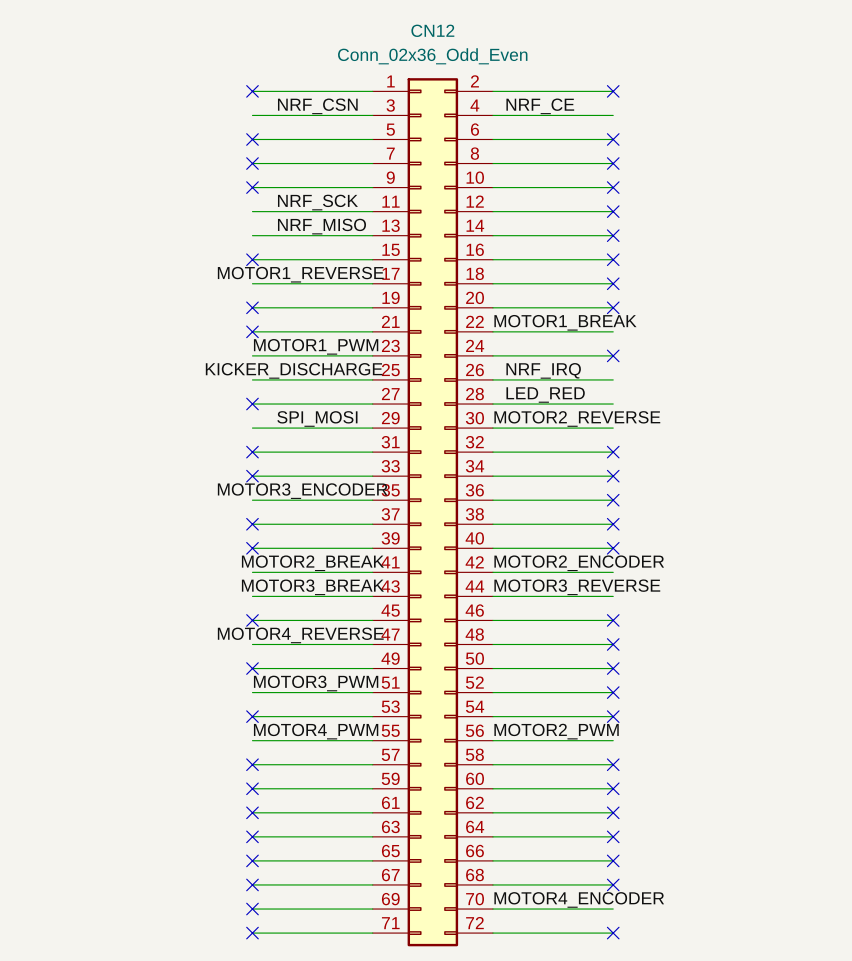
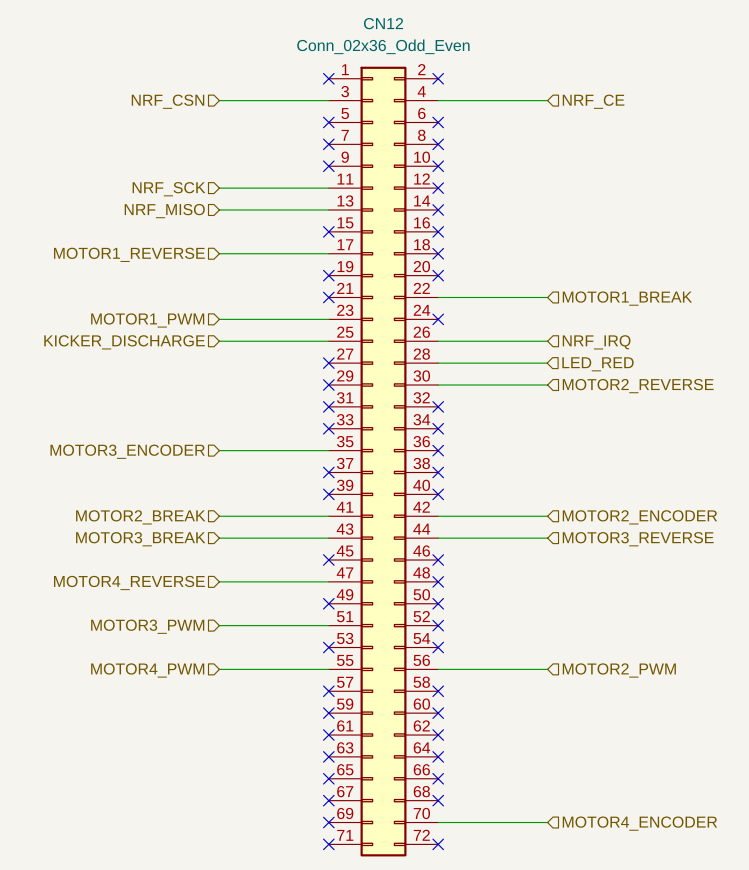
wire: (252, 91) (372, 91) -> none
no-connect mark: (252, 91) -> none
no-connect mark: none -> (328, 78)
wire: (492, 91) (613, 91) -> none
no-connect mark: none -> (438, 78)
no-connect mark: (613, 91) -> none
label: NRF_CSN (317, 106) -> none
label: NRF_CE (540, 106) -> none
hierarchical label: none -> NRF_CSN (168, 101)
hierarchical label: none -> NRF_CE (593, 101)
wire: (252, 139) (372, 139) -> none
no-connect mark: (252, 139) -> none
no-connect mark: none -> (328, 122)
wire: (492, 139) (613, 139) -> none
no-connect mark: none -> (438, 122)
no-connect mark: (613, 139) -> none
wire: (252, 163) (372, 163) -> none
no-connect mark: (252, 163) -> none
no-connect mark: none -> (328, 144)
wire: (492, 163) (613, 163) -> none
no-connect mark: none -> (438, 144)
no-connect mark: (613, 163) -> none
wire: (252, 187) (372, 187) -> none
no-connect mark: (252, 187) -> none
no-connect mark: none -> (328, 166)
wire: (492, 187) (613, 187) -> none
no-connect mark: none -> (438, 166)
no-connect mark: (613, 187) -> none
label: NRF_SCK (317, 202) -> none
wire: (492, 211) (613, 211) -> none
no-connect mark: none -> (438, 188)
no-connect mark: (613, 211) -> none
hierarchical label: none -> NRF_SCK (169, 189)
label: NRF_MISO (321, 226) -> none
wire: (492, 235) (613, 235) -> none
no-connect mark: none -> (438, 209)
no-connect mark: (613, 235) -> none
hierarchical label: none -> NRF_MISO (164, 211)
wire: (252, 259) (372, 259) -> none
no-connect mark: (252, 259) -> none
no-connect mark: none -> (328, 231)
wire: (492, 259) (613, 259) -> none
no-connect mark: none -> (438, 231)
no-connect mark: (613, 259) -> none
label: MOTOR1_REVERSE (300, 274) -> none
wire: (492, 283) (613, 283) -> none
no-connect mark: none -> (438, 253)
no-connect mark: (613, 283) -> none
hierarchical label: none -> MOTOR1_REVERSE (129, 254)
wire: (252, 307) (372, 307) -> none
no-connect mark: (252, 307) -> none
no-connect mark: none -> (328, 275)
wire: (492, 307) (613, 307) -> none
no-connect mark: none -> (438, 275)
no-connect mark: (613, 307) -> none
label: MOTOR1_BREAK (565, 322) -> none
wire: (252, 331) (372, 331) -> none
no-connect mark: (252, 331) -> none
no-connect mark: none -> (328, 297)
hierarchical label: none -> MOTOR1_BREAK (627, 298)
label: MOTOR1_PWM (316, 346) -> none
wire: (492, 355) (613, 355) -> none
no-connect mark: none -> (438, 319)
no-connect mark: (613, 355) -> none
hierarchical label: none -> MOTOR1_PWM (147, 320)
label: KICKER_DISCHARGE (294, 370) -> none
label: NRF_IRQ (543, 370) -> none
hierarchical label: none -> KICKER_DISCHARGE (124, 342)
hierarchical label: none -> NRF_IRQ (596, 342)
label: LED_RED (545, 395) -> none
wire: (252, 404) (372, 404) -> none
no-connect mark: (252, 404) -> none
no-connect mark: none -> (328, 363)
hierarchical label: none -> LED_RED (598, 364)
label: SPI_MOSI (317, 418) -> none
label: MOTOR2_REVERSE (577, 418) -> none
wire: (252, 428) (372, 428) -> none
no-connect mark: none -> (328, 385)
hierarchical label: none -> MOTOR2_REVERSE (638, 386)
wire: (252, 452) (372, 452) -> none
no-connect mark: (252, 452) -> none
no-connect mark: none -> (328, 406)
wire: (492, 452) (613, 452) -> none
no-connect mark: none -> (438, 406)
no-connect mark: (613, 452) -> none
wire: (252, 476) (372, 476) -> none
no-connect mark: (252, 476) -> none
no-connect mark: none -> (328, 428)
wire: (492, 476) (613, 476) -> none
no-connect mark: none -> (438, 428)
no-connect mark: (613, 476) -> none
label: MOTOR3_ENCODER (302, 491) -> none
wire: (492, 500) (613, 500) -> none
no-connect mark: none -> (438, 450)
no-connect mark: (613, 500) -> none
hierarchical label: none -> MOTOR3_ENCODER (127, 451)
wire: (252, 524) (372, 524) -> none
no-connect mark: (252, 524) -> none
no-connect mark: none -> (328, 472)
wire: (492, 524) (613, 524) -> none
no-connect mark: none -> (438, 472)
no-connect mark: (613, 524) -> none
wire: (252, 548) (372, 548) -> none
no-connect mark: (252, 548) -> none
no-connect mark: none -> (328, 494)
wire: (492, 548) (613, 548) -> none
no-connect mark: none -> (438, 494)
no-connect mark: (613, 548) -> none
label: MOTOR2_BREAK (312, 563) -> none
label: MOTOR2_ENCODER (579, 563) -> none
hierarchical label: none -> MOTOR2_BREAK (140, 517)
hierarchical label: none -> MOTOR2_ENCODER (639, 517)
label: MOTOR3_BREAK (312, 587) -> none
label: MOTOR3_REVERSE (577, 587) -> none
hierarchical label: none -> MOTOR3_BREAK (140, 539)
hierarchical label: none -> MOTOR3_REVERSE (638, 539)
wire: (252, 620) (372, 620) -> none
no-connect mark: (252, 620) -> none
no-connect mark: none -> (328, 560)
wire: (492, 620) (613, 620) -> none
no-connect mark: none -> (438, 560)
no-connect mark: (613, 620) -> none
label: MOTOR4_REVERSE (300, 635) -> none
wire: (492, 644) (613, 644) -> none
no-connect mark: none -> (438, 581)
no-connect mark: (613, 644) -> none
hierarchical label: none -> MOTOR4_REVERSE (129, 582)
wire: (252, 668) (372, 668) -> none
no-connect mark: (252, 668) -> none
no-connect mark: none -> (328, 603)
wire: (492, 668) (613, 668) -> none
no-connect mark: none -> (438, 603)
no-connect mark: (613, 668) -> none
label: MOTOR3_PWM (316, 683) -> none
wire: (492, 692) (613, 692) -> none
no-connect mark: none -> (438, 625)
no-connect mark: (613, 692) -> none
hierarchical label: none -> MOTOR3_PWM (147, 626)
wire: (252, 716) (372, 716) -> none
no-connect mark: (252, 716) -> none
no-connect mark: none -> (328, 647)
wire: (492, 716) (613, 716) -> none
no-connect mark: none -> (438, 647)
no-connect mark: (613, 716) -> none
label: MOTOR4_PWM (316, 731) -> none
label: MOTOR2_PWM (556, 731) -> none
hierarchical label: none -> MOTOR4_PWM (147, 670)
hierarchical label: none -> MOTOR2_PWM (619, 670)
wire: (252, 764) (372, 764) -> none
no-connect mark: (252, 764) -> none
no-connect mark: none -> (328, 691)
wire: (492, 764) (613, 764) -> none
no-connect mark: none -> (438, 691)
no-connect mark: (613, 764) -> none
wire: (252, 788) (372, 788) -> none
no-connect mark: (252, 788) -> none
no-connect mark: none -> (328, 713)
wire: (492, 788) (613, 788) -> none
no-connect mark: none -> (438, 713)
no-connect mark: (613, 788) -> none
wire: (252, 812) (372, 812) -> none
no-connect mark: (252, 812) -> none
no-connect mark: none -> (328, 735)
wire: (492, 812) (613, 812) -> none
no-connect mark: none -> (438, 735)
no-connect mark: (613, 812) -> none
wire: (252, 836) (372, 836) -> none
no-connect mark: (252, 836) -> none
no-connect mark: none -> (328, 756)
wire: (492, 836) (613, 836) -> none
no-connect mark: none -> (438, 756)
no-connect mark: (613, 836) -> none
wire: (252, 860) (372, 860) -> none
no-connect mark: (252, 860) -> none
no-connect mark: none -> (328, 778)
wire: (492, 860) (613, 860) -> none
no-connect mark: none -> (438, 778)
no-connect mark: (613, 860) -> none
wire: (252, 884) (372, 884) -> none
no-connect mark: (252, 884) -> none
no-connect mark: none -> (328, 800)
wire: (492, 884) (613, 884) -> none
no-connect mark: none -> (438, 800)
no-connect mark: (613, 884) -> none
label: MOTOR4_ENCODER (579, 899) -> none
wire: (252, 909) (372, 909) -> none
no-connect mark: (252, 909) -> none
no-connect mark: none -> (328, 822)
hierarchical label: none -> MOTOR4_ENCODER (639, 823)
wire: (252, 933) (372, 933) -> none
no-connect mark: (252, 933) -> none
no-connect mark: none -> (328, 844)
wire: (492, 933) (613, 933) -> none
no-connect mark: none -> (438, 844)
no-connect mark: (613, 933) -> none

